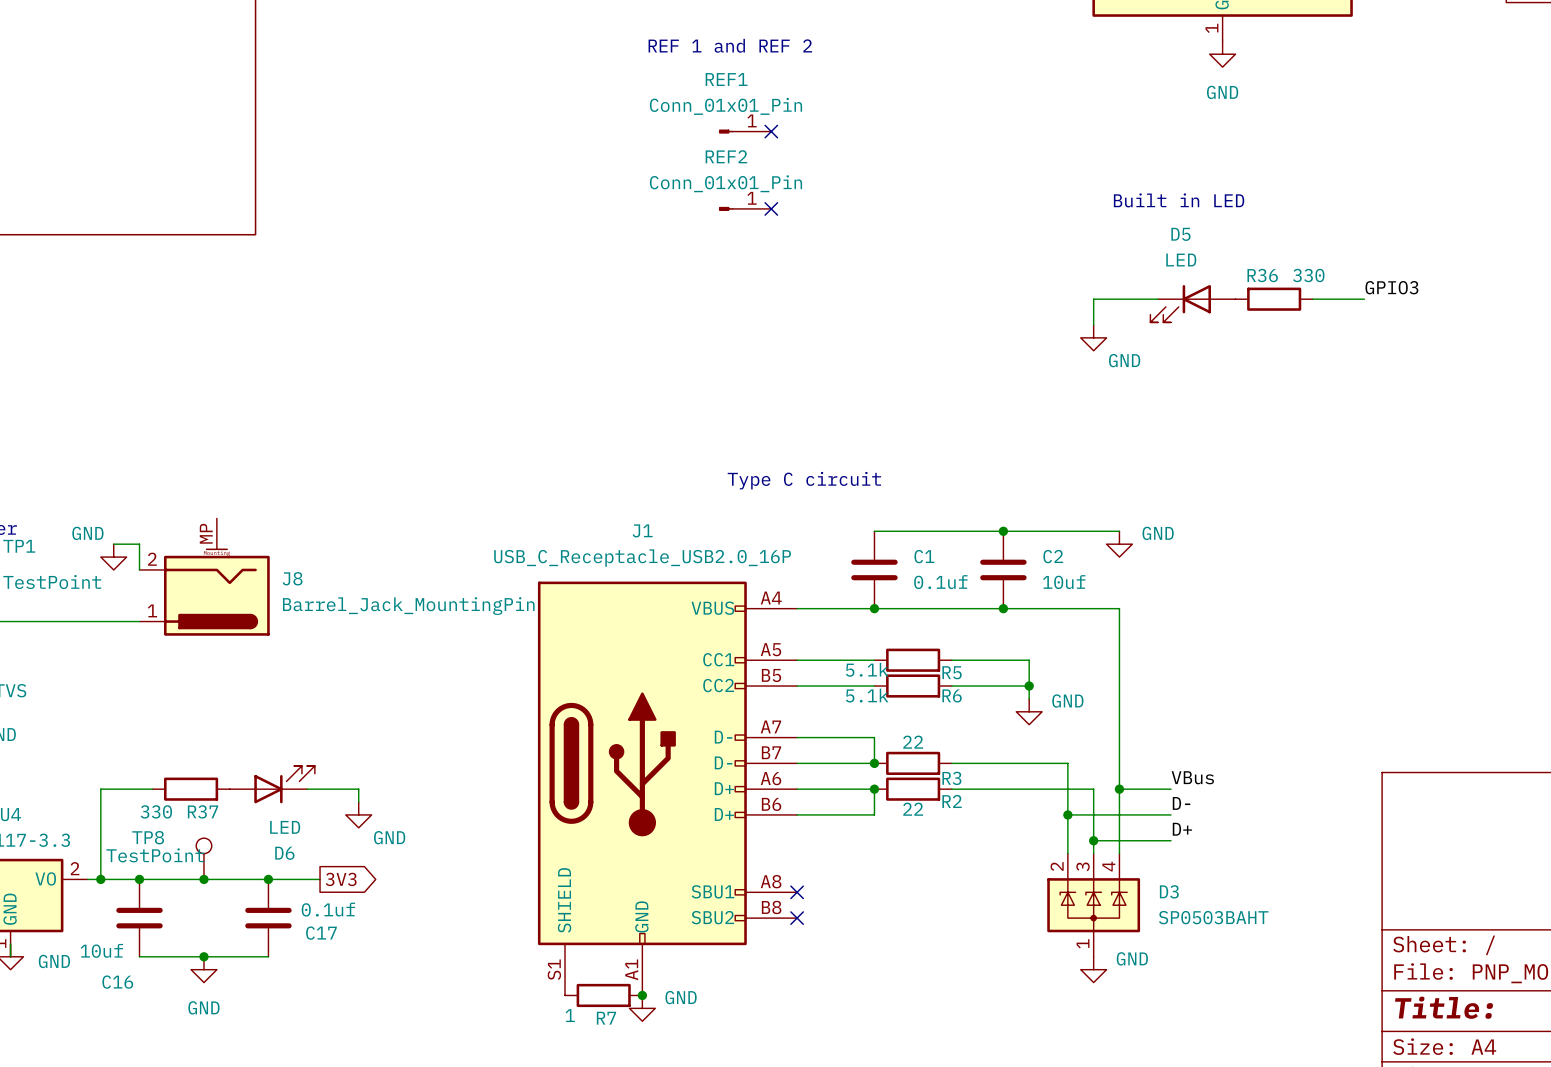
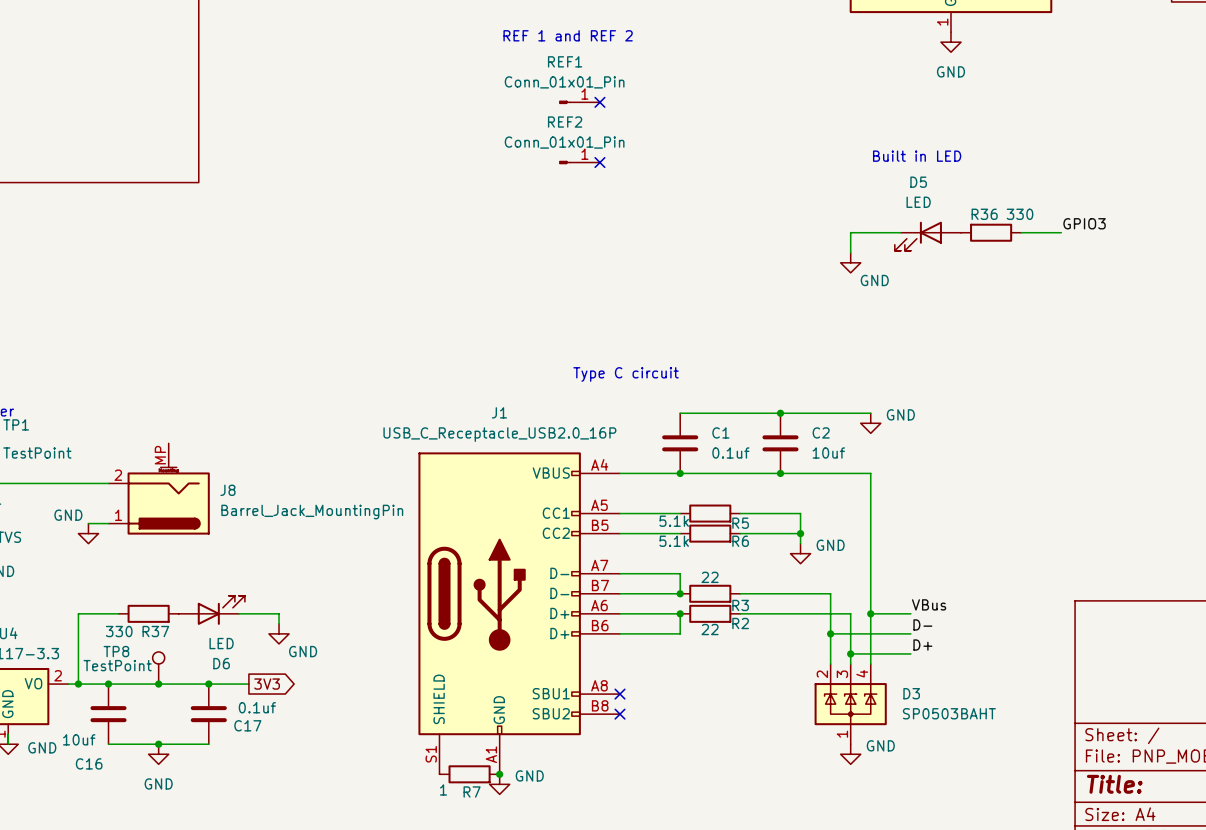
wire: (113, 544) (139, 544) (139, 569) -> none
power symbol position: GND (113, 557) -> GND (88, 533)
J8 position: (204, 577) -> (159, 488)
wire: none -> (88, 523) (108, 523)

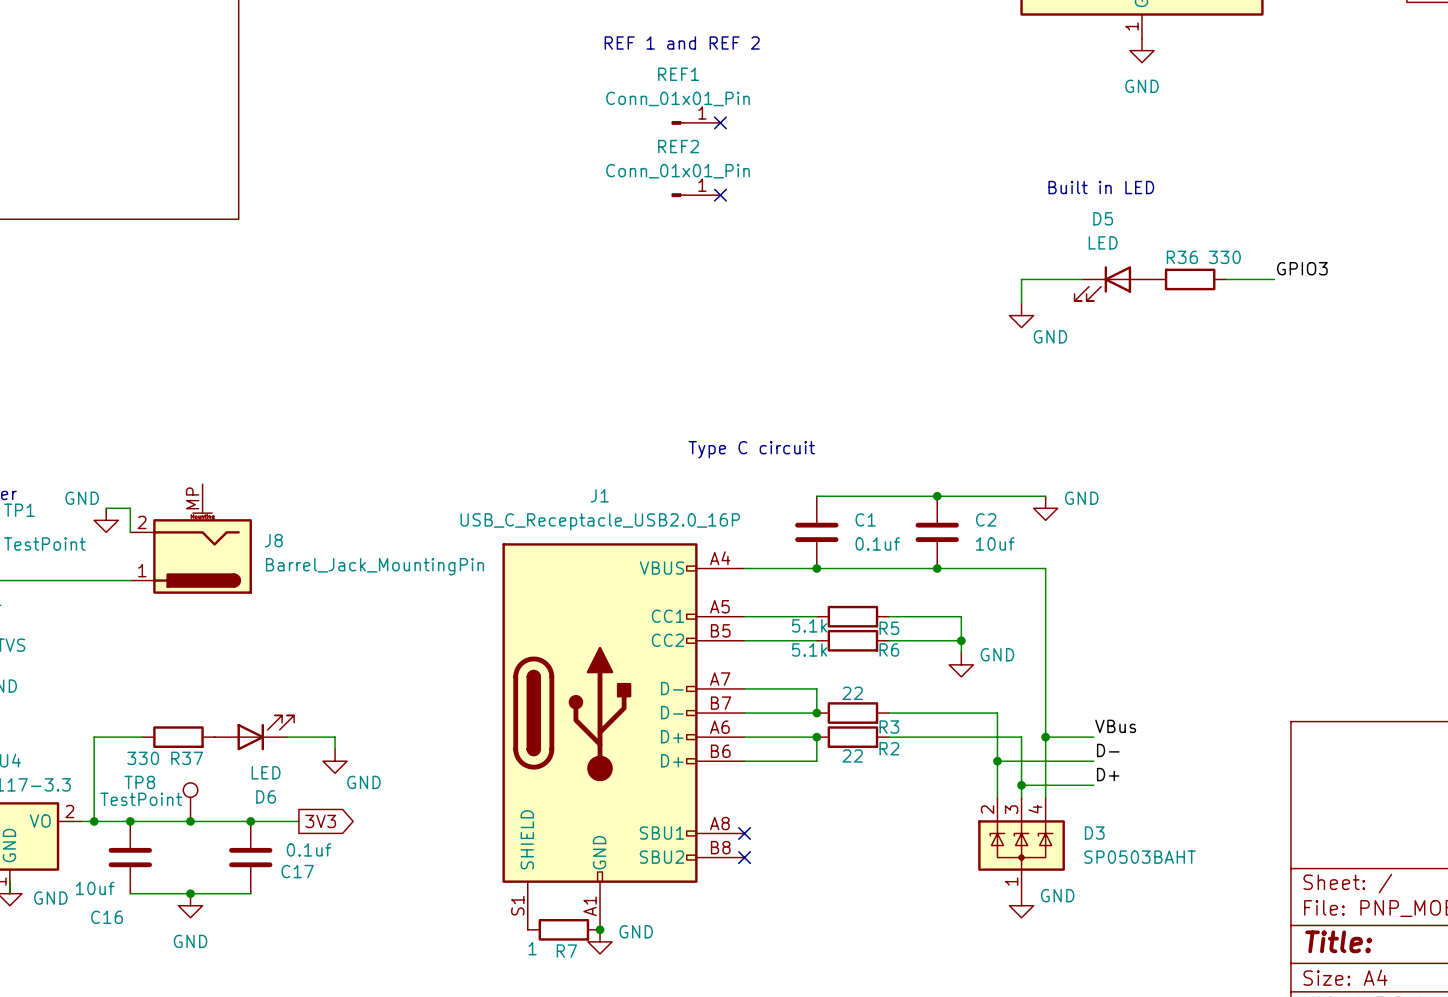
wire: none -> (106, 508) (130, 508) (130, 532)
J8 position: (159, 488) -> (191, 539)
wire: (88, 523) (108, 523) -> none
power symbol position: GND (88, 533) -> GND (106, 520)

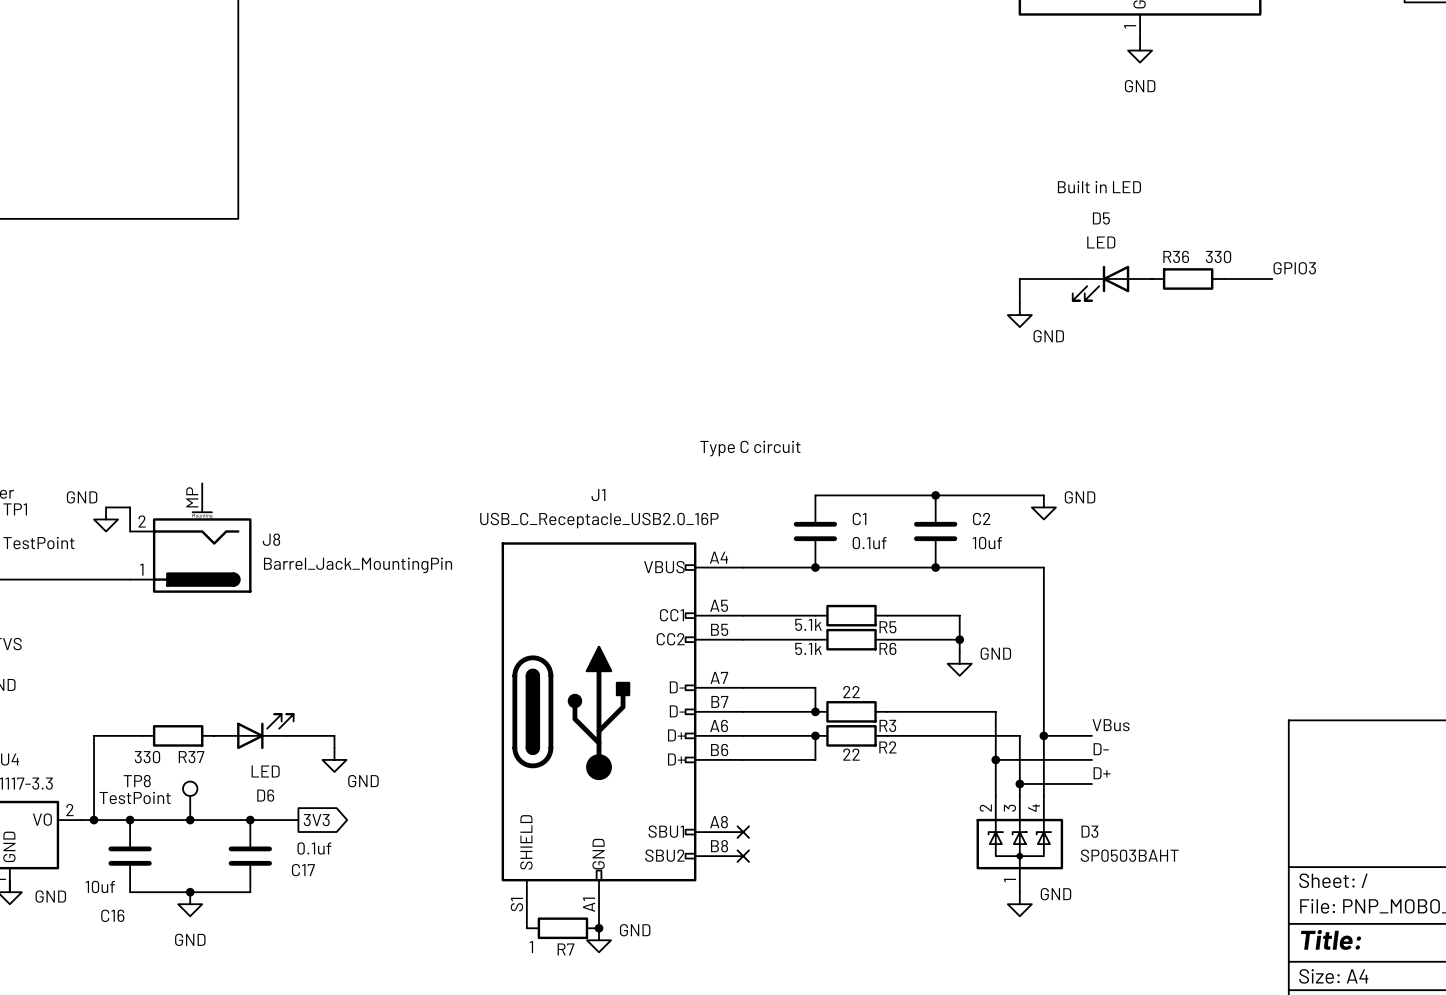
text: REF 1 and REF 2 (682, 43) -> none
REF1: Conn_01x01_Pin (696, 122) -> none
no-connect mark: (720, 122) -> none
REF2: Conn_01x01_Pin (696, 195) -> none
no-connect mark: (720, 195) -> none

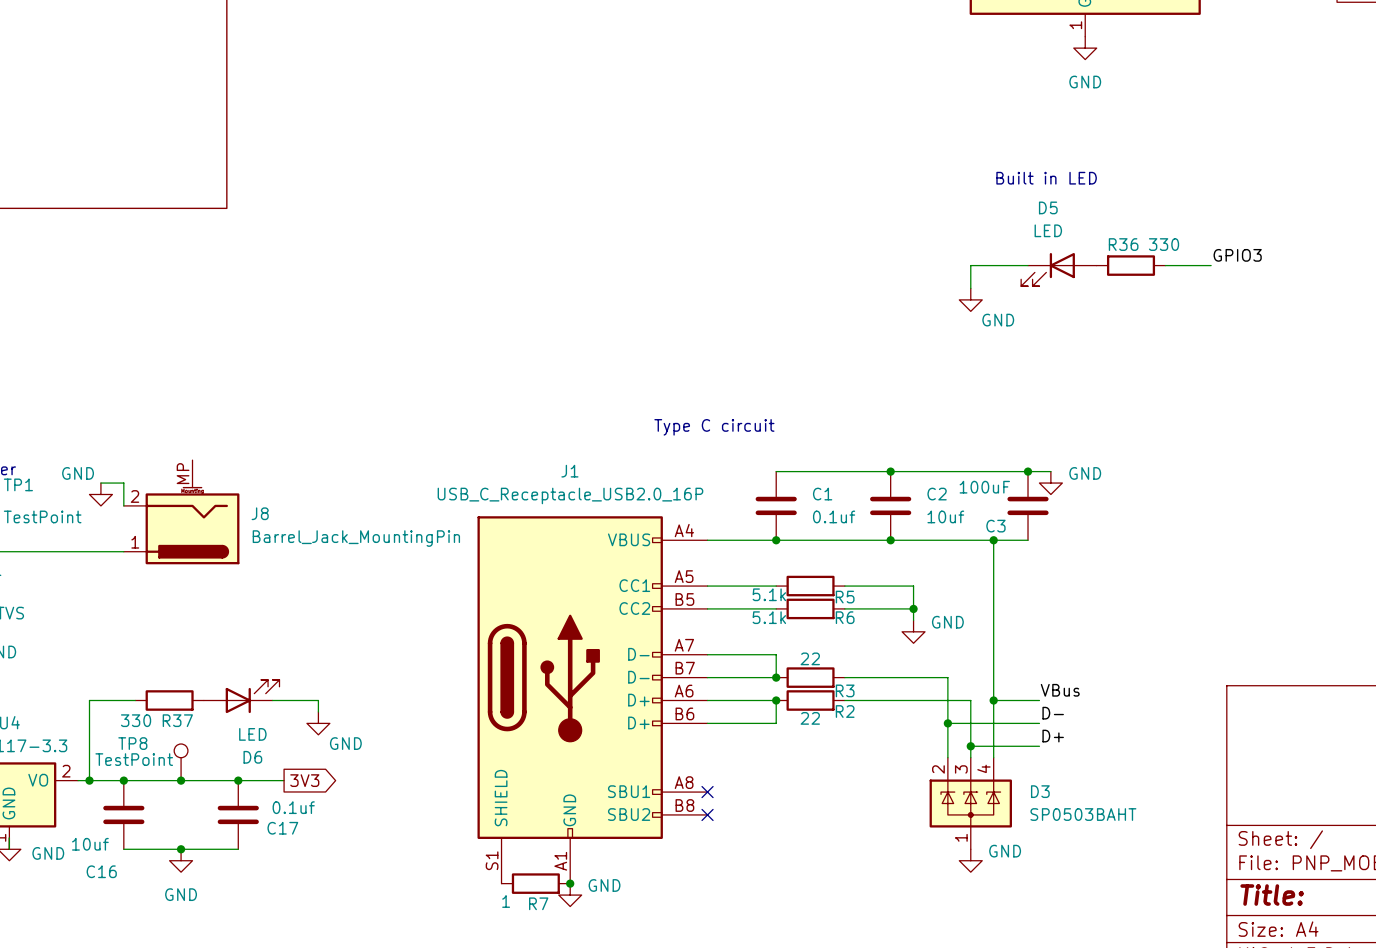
wire: none -> (993, 471) (1050, 471)
junction: none -> (1028, 471)
power symbol position: GND (1043, 507) -> GND (1050, 483)
C3: none -> 100uF (1028, 505)
wire: none -> (993, 540) (1028, 540)
junction: none -> (993, 540)

